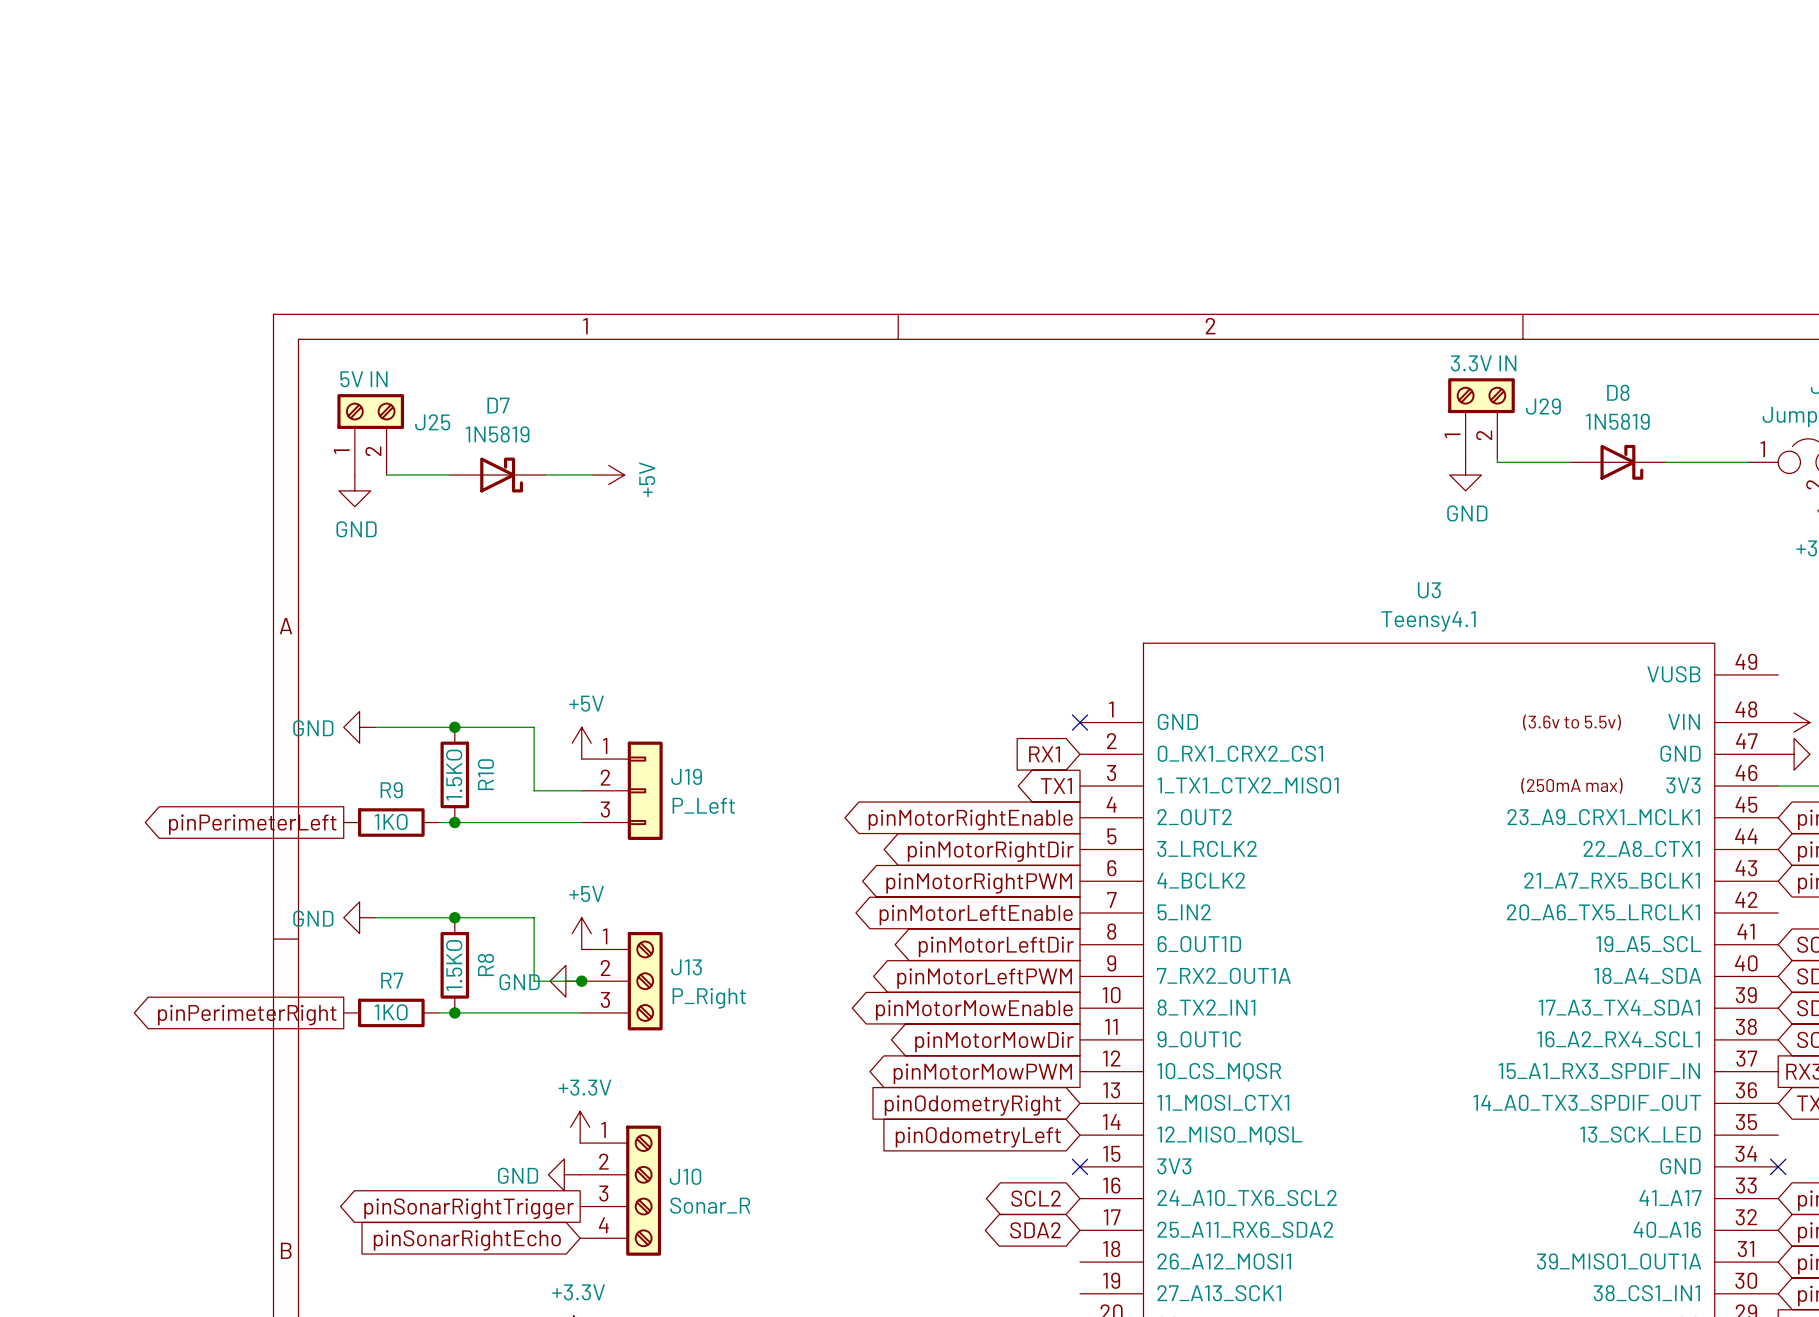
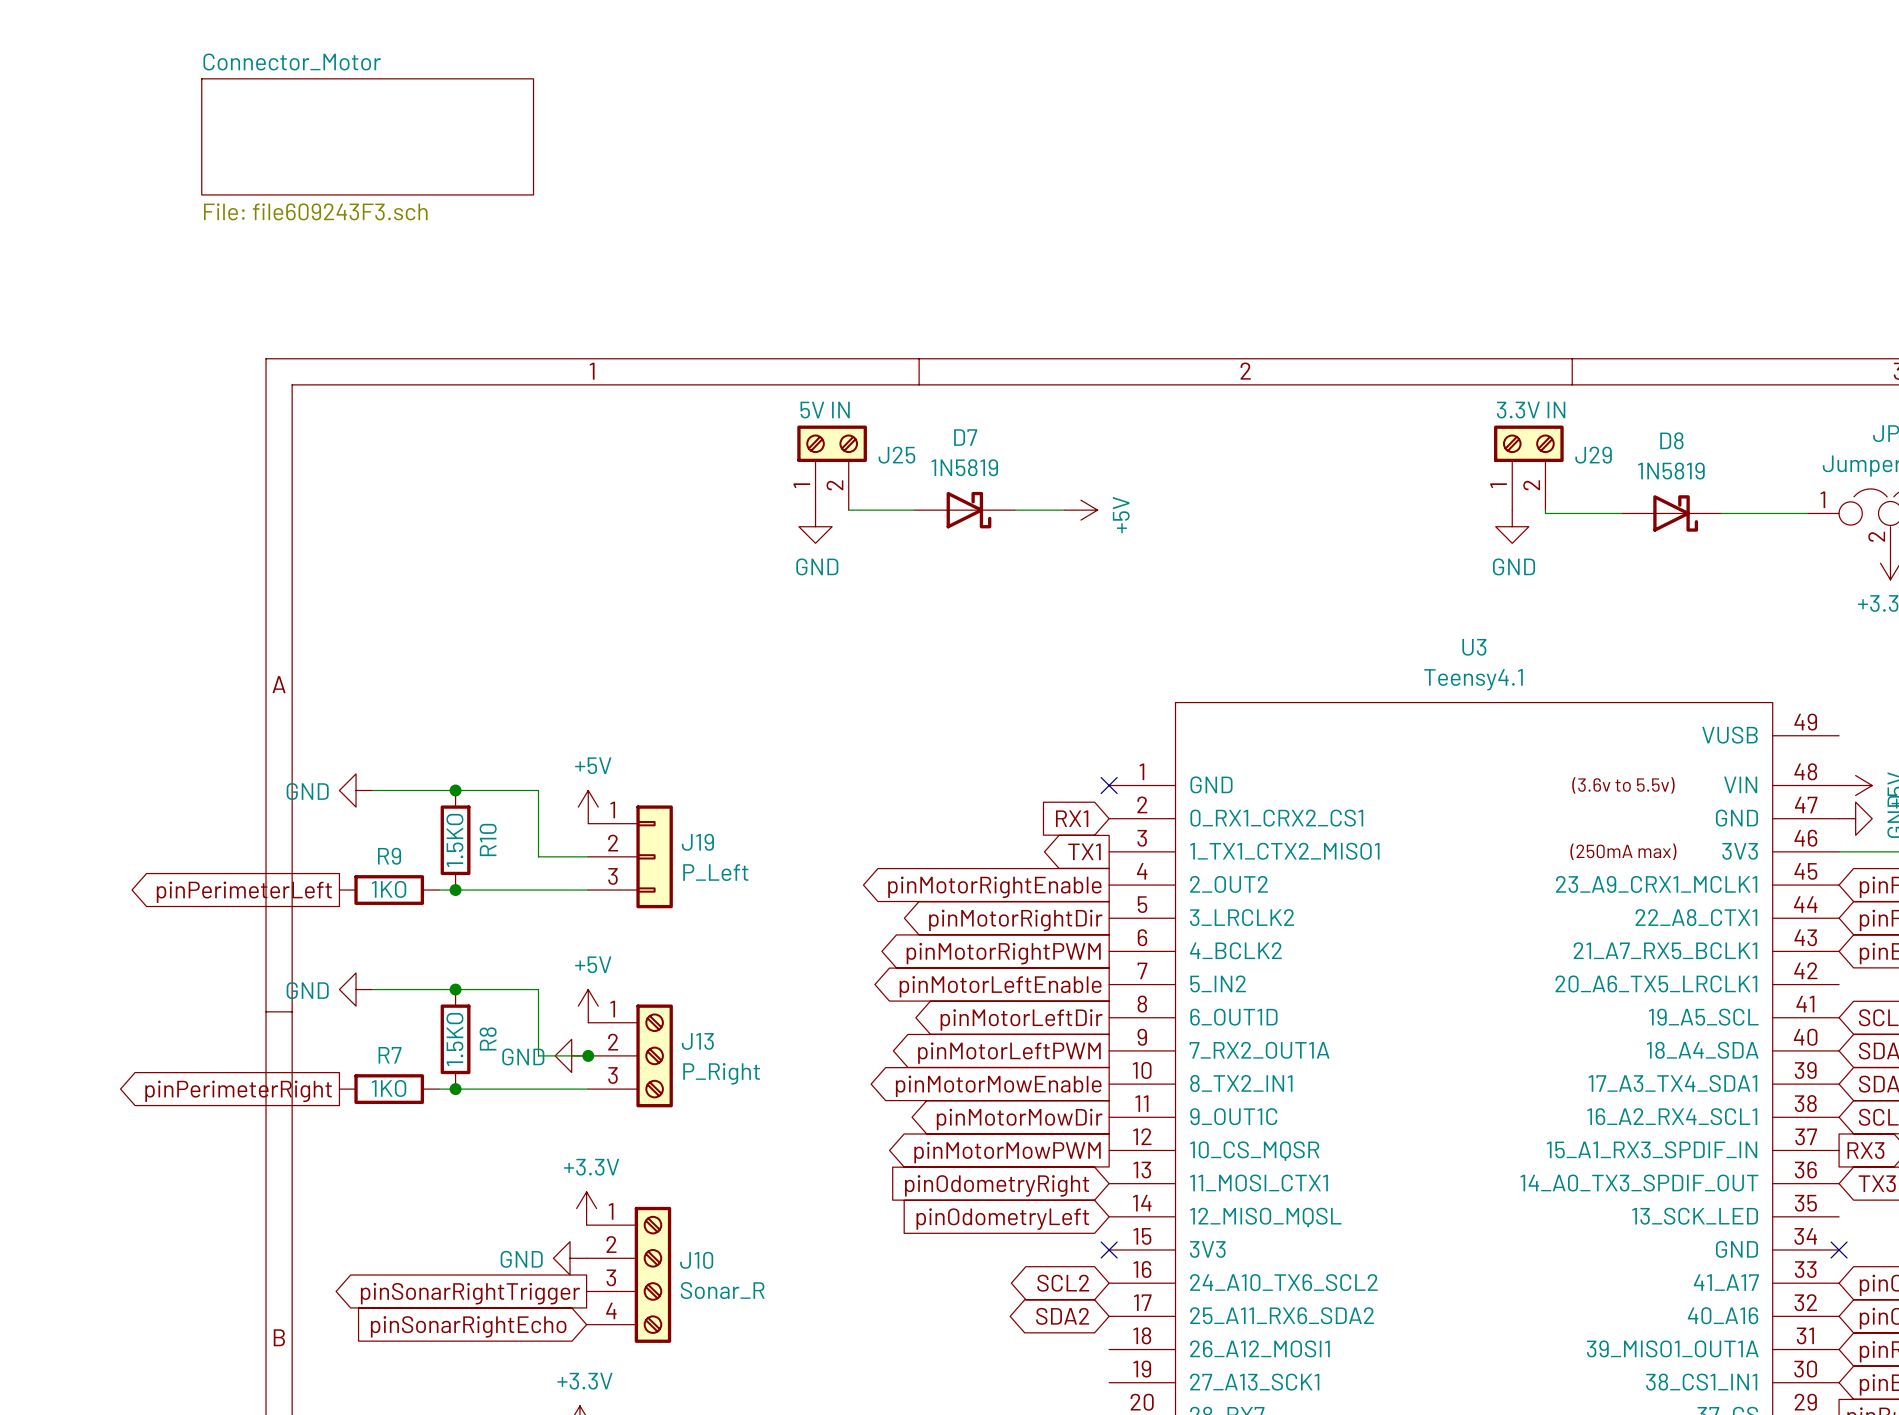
sheet Connector_Motor: none -> File: file609243F3.sch (367, 136)
J25 position: (370, 434) -> (832, 467)
wire: none -> (848, 510) (915, 510)
wire: none -> (1014, 510) (1064, 510)
power symbol: none -> +5V (1080, 510)
wire: (386, 475) (450, 475) -> none
D7 position: (497, 475) -> (964, 510)
wire: (545, 475) (592, 475) -> none
power symbol: +5V (608, 475) -> none
power symbol: none -> GND (815, 526)
power symbol: GND (354, 490) -> none

